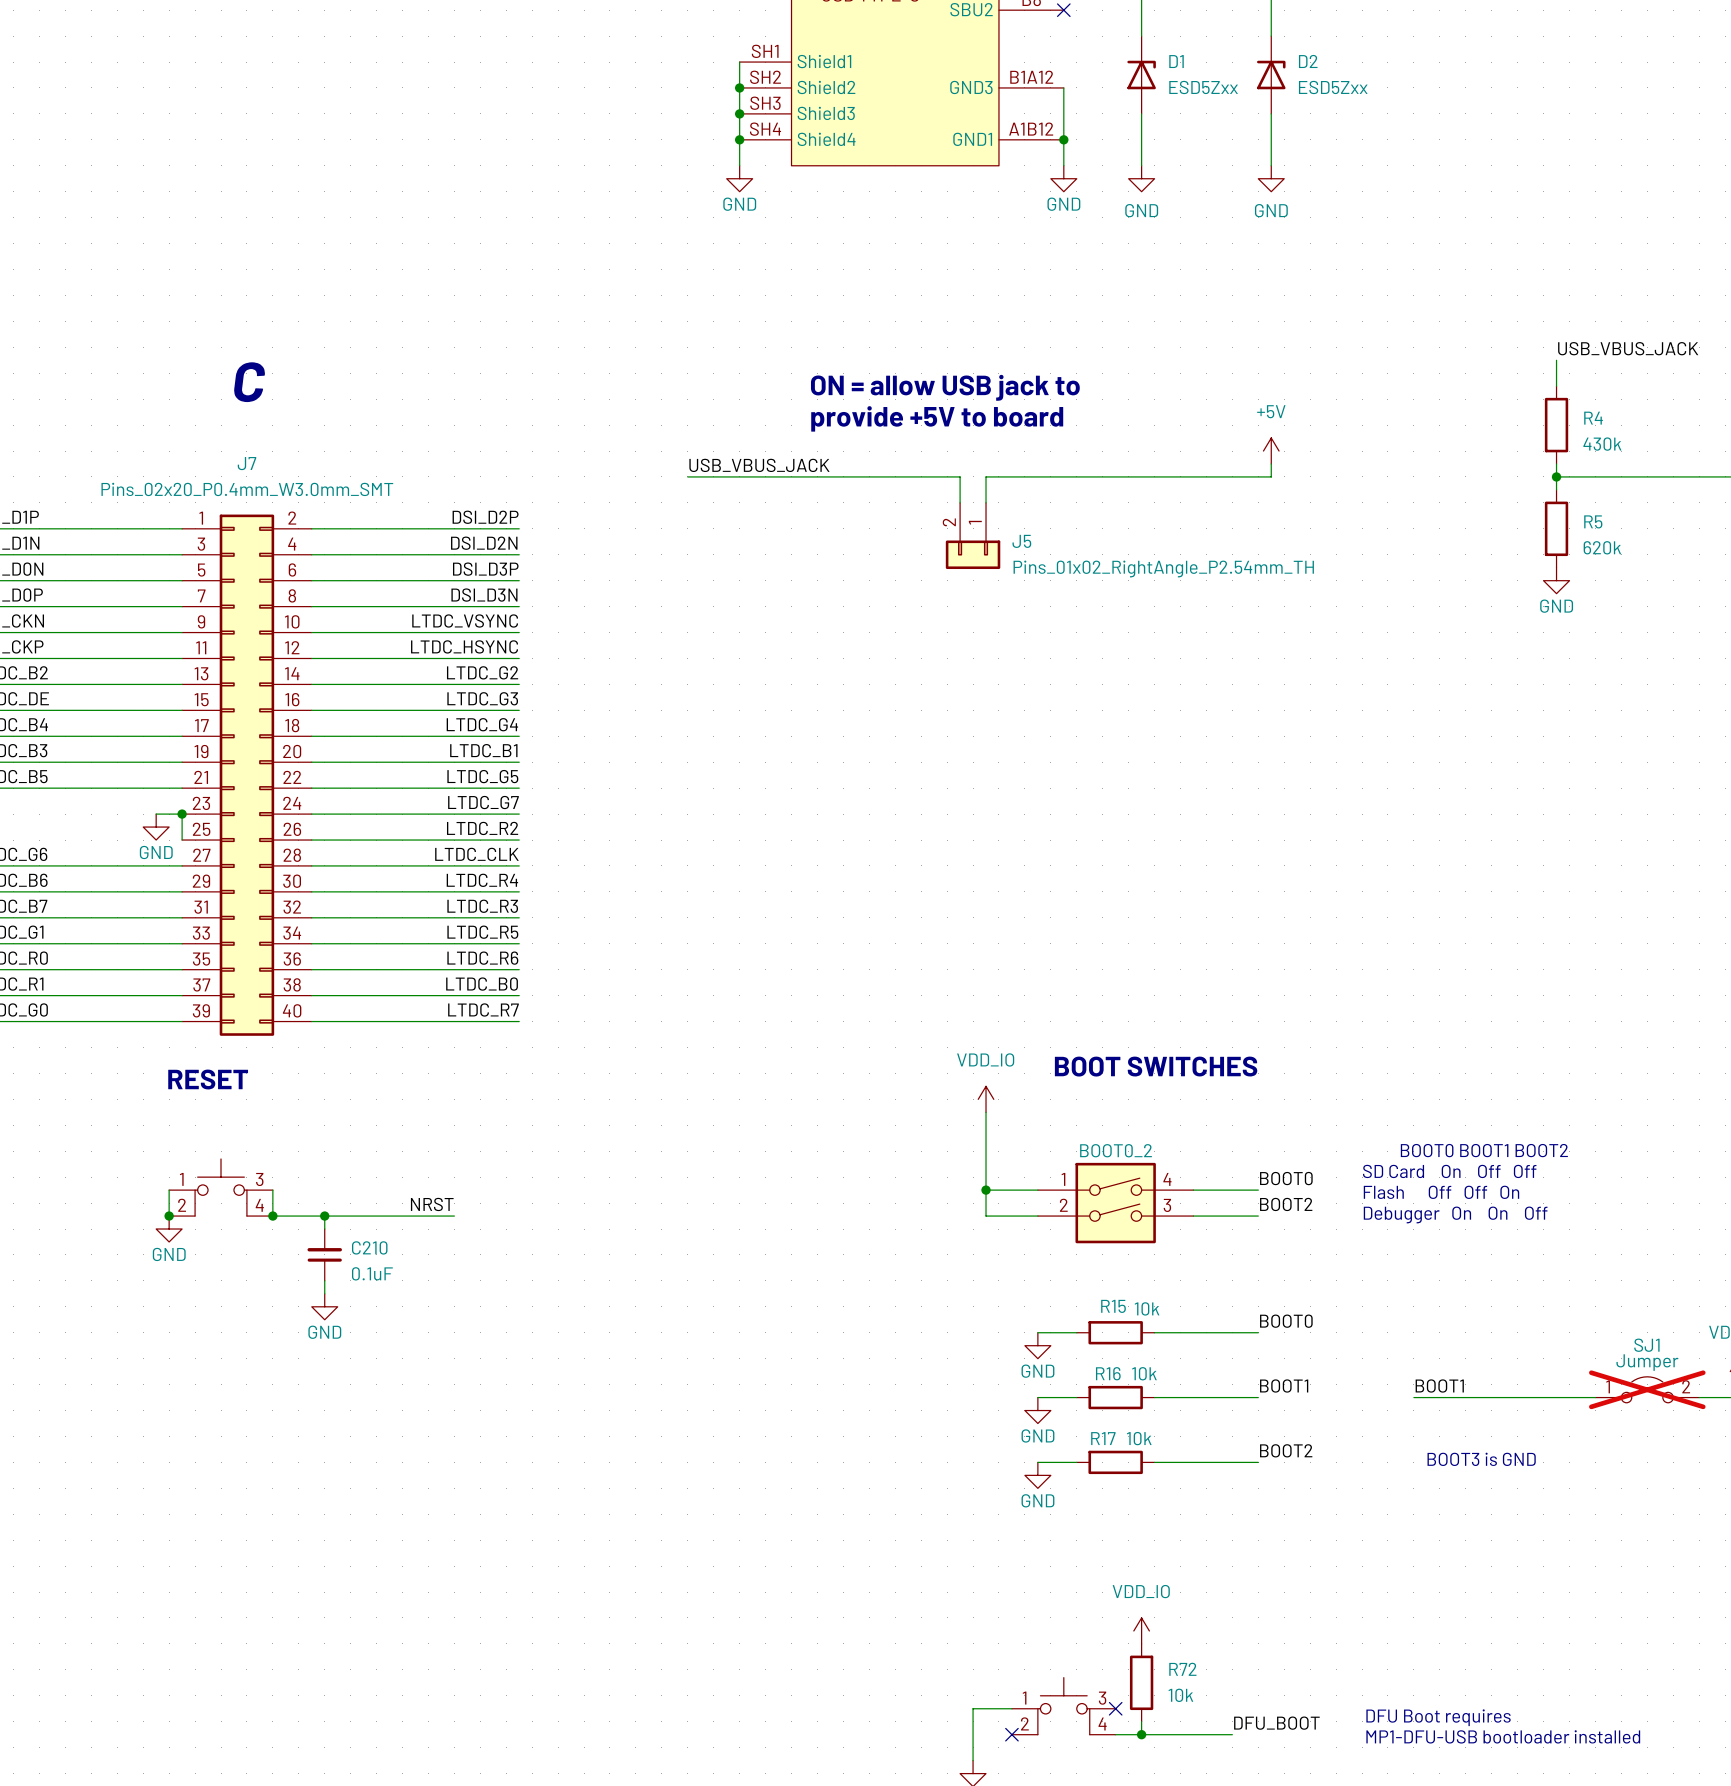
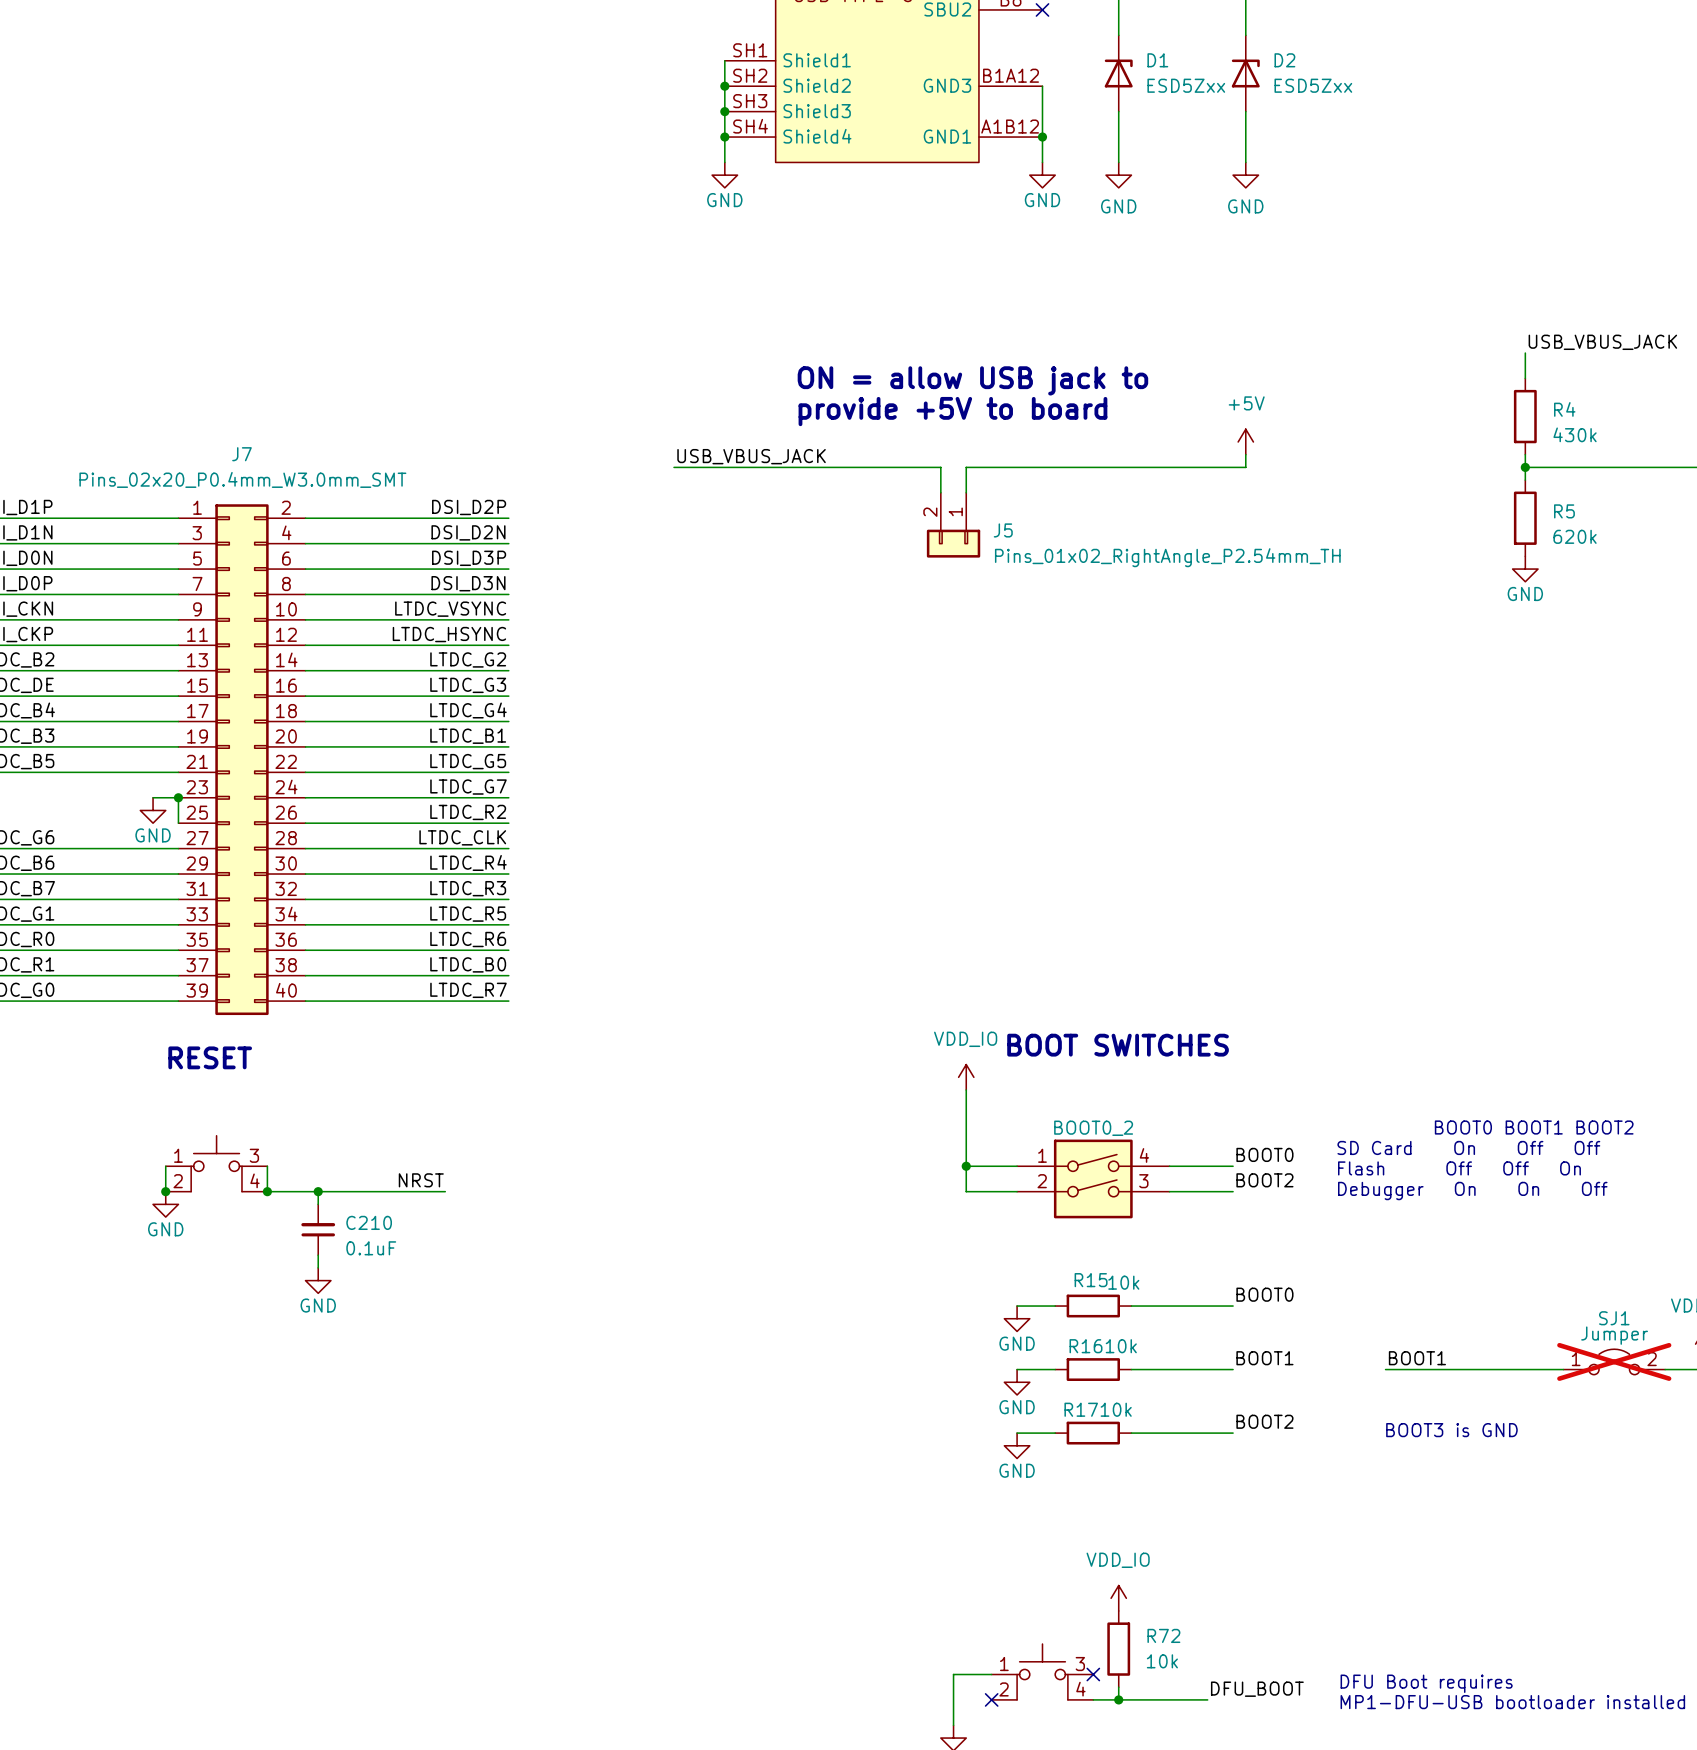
text: C (249, 382) -> none

